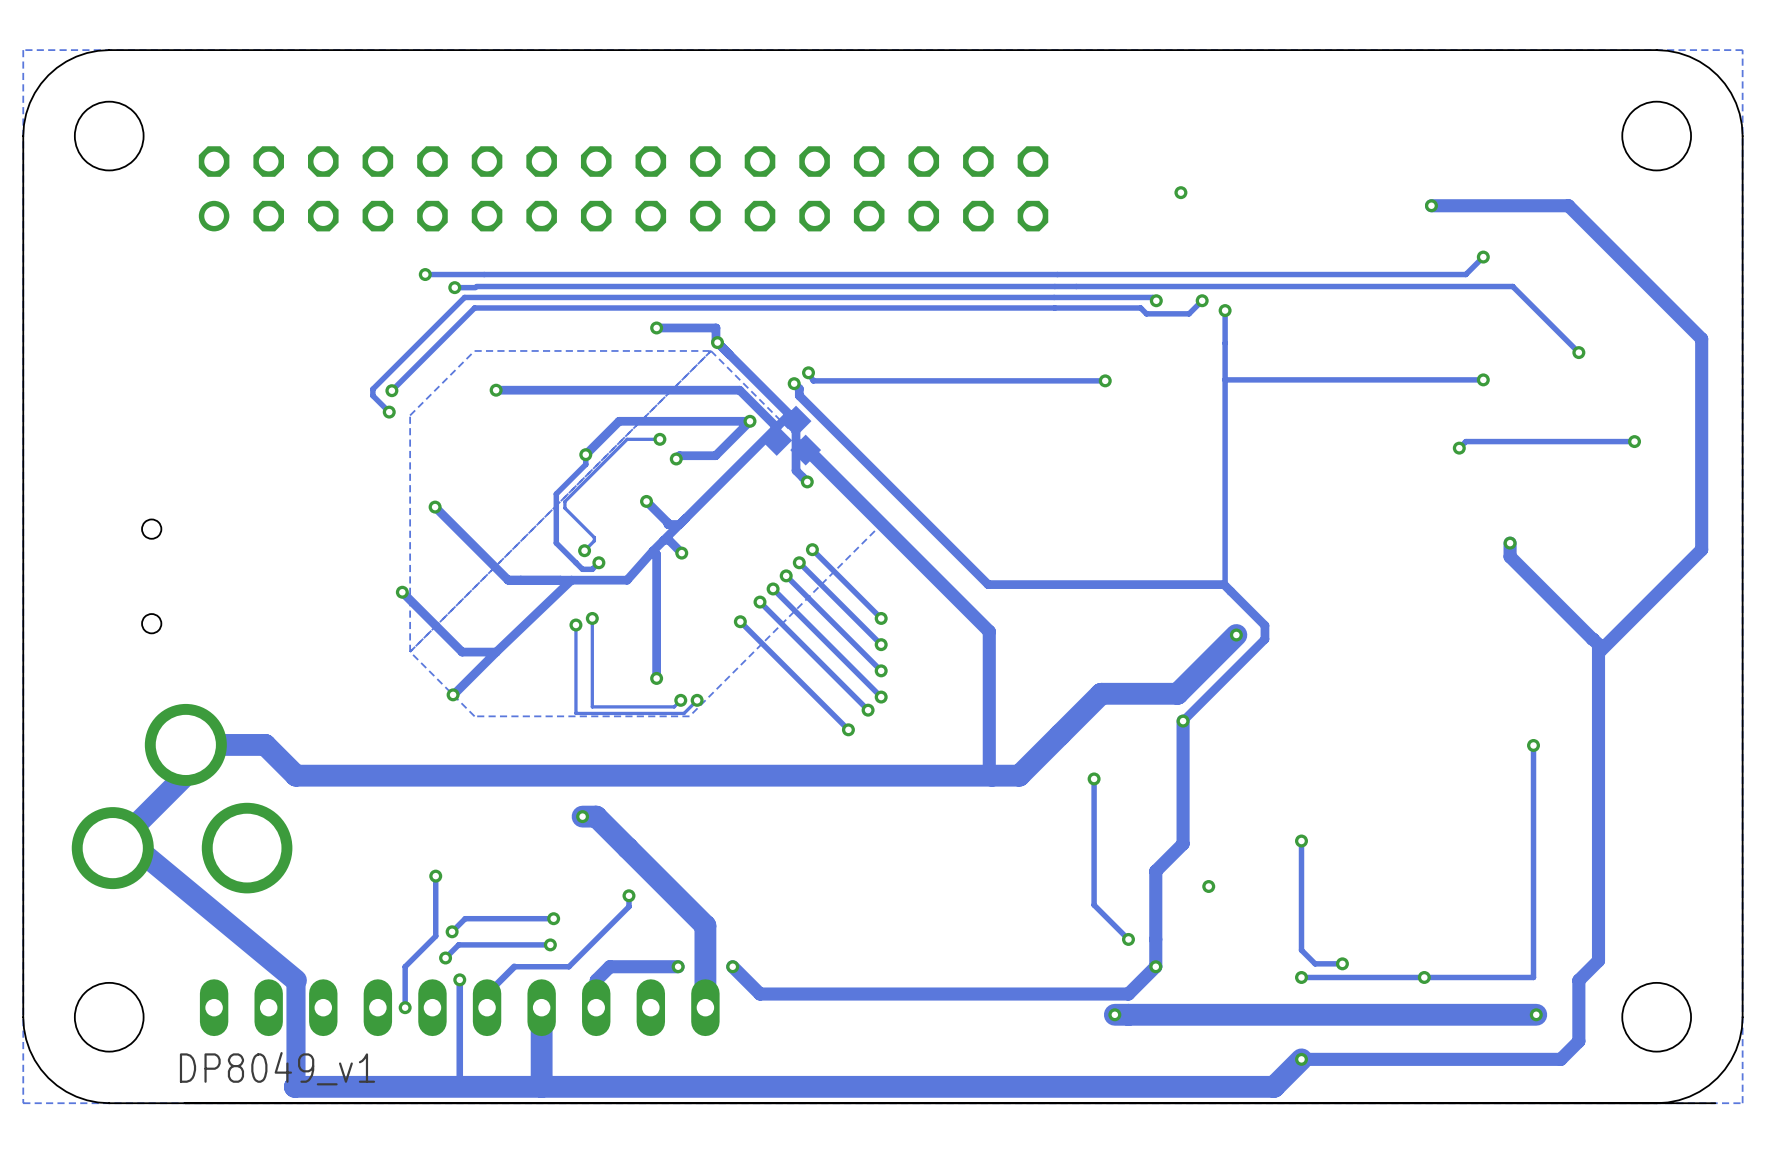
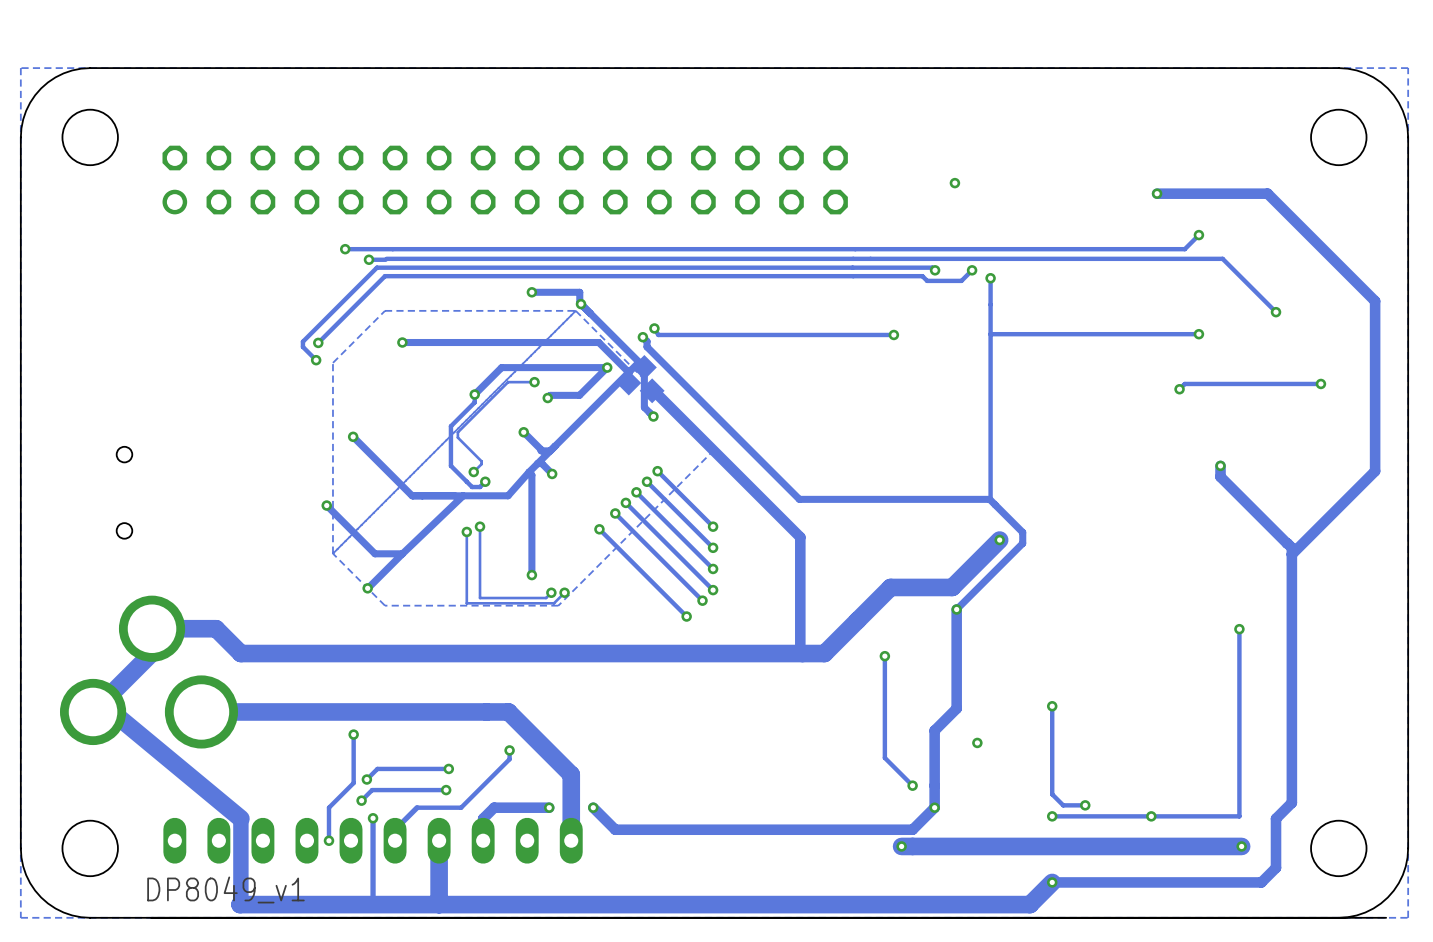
track: (582, 816) (596, 816) (627, 848) -> (201, 711) (508, 711)
via: (582, 816) -> none

